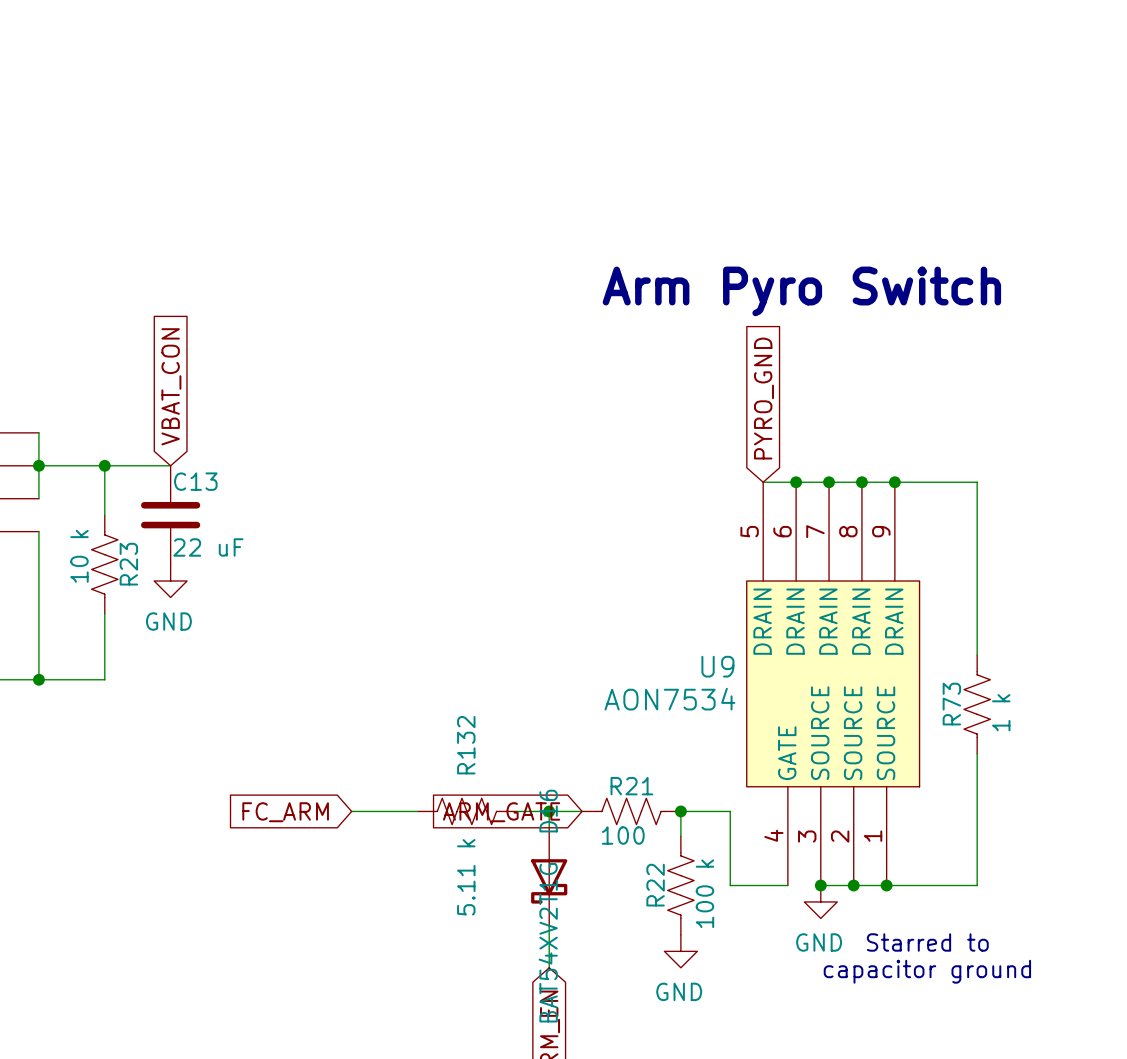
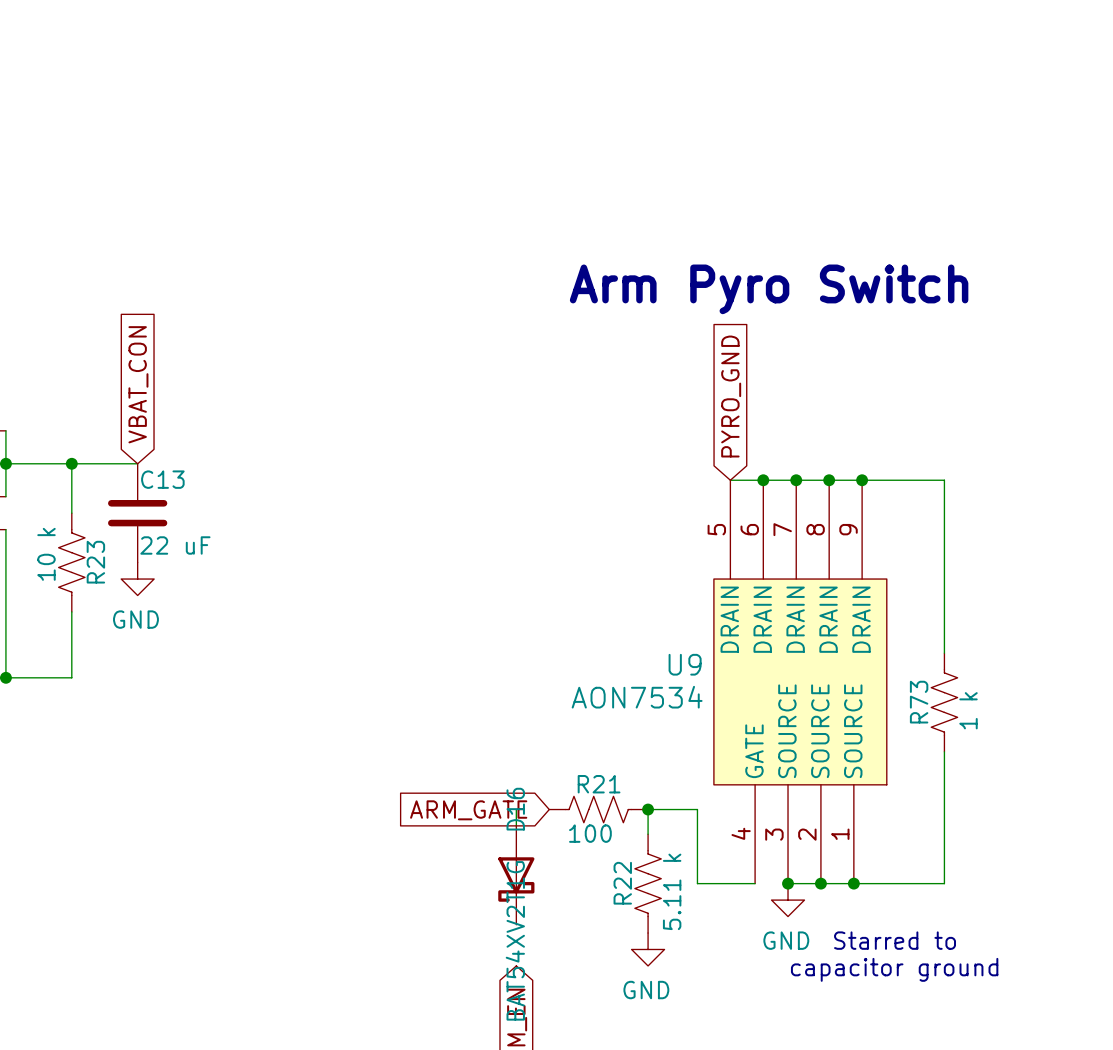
wire: (351, 811) (417, 811) -> none
R132: 5.11 k (466, 811) -> none
wire: (516, 811) (582, 811) -> none
junction: (549, 811) -> none
global label: FC_ARM (285, 812) -> none
R22 value: 100 k (704, 893) -> 5.11 k (672, 891)
wire: (549, 926) (549, 967) -> none

